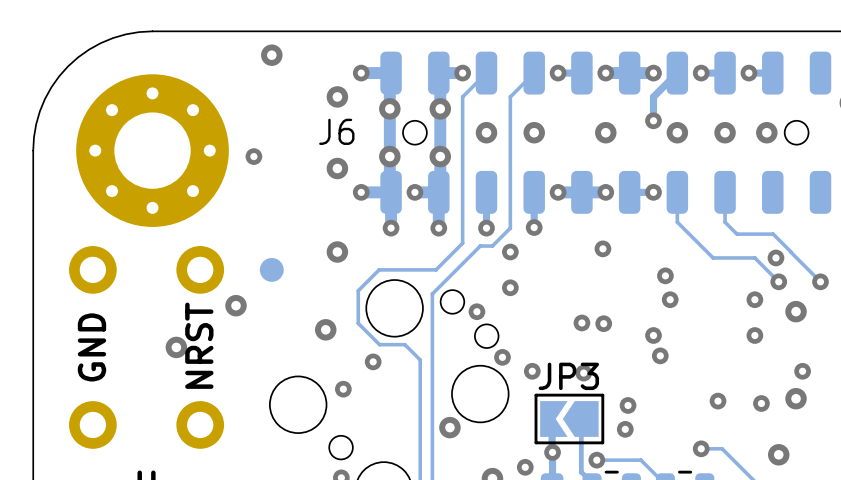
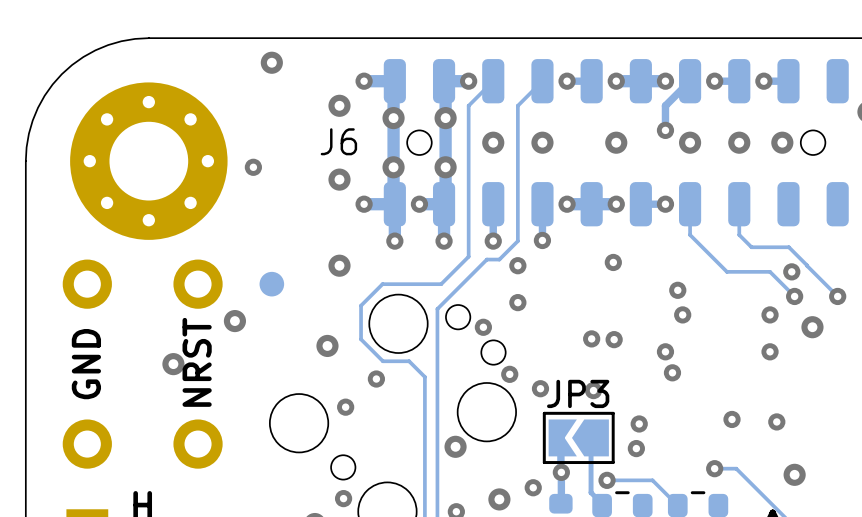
via: (802, 371) -> none
via: (796, 398) -> none

